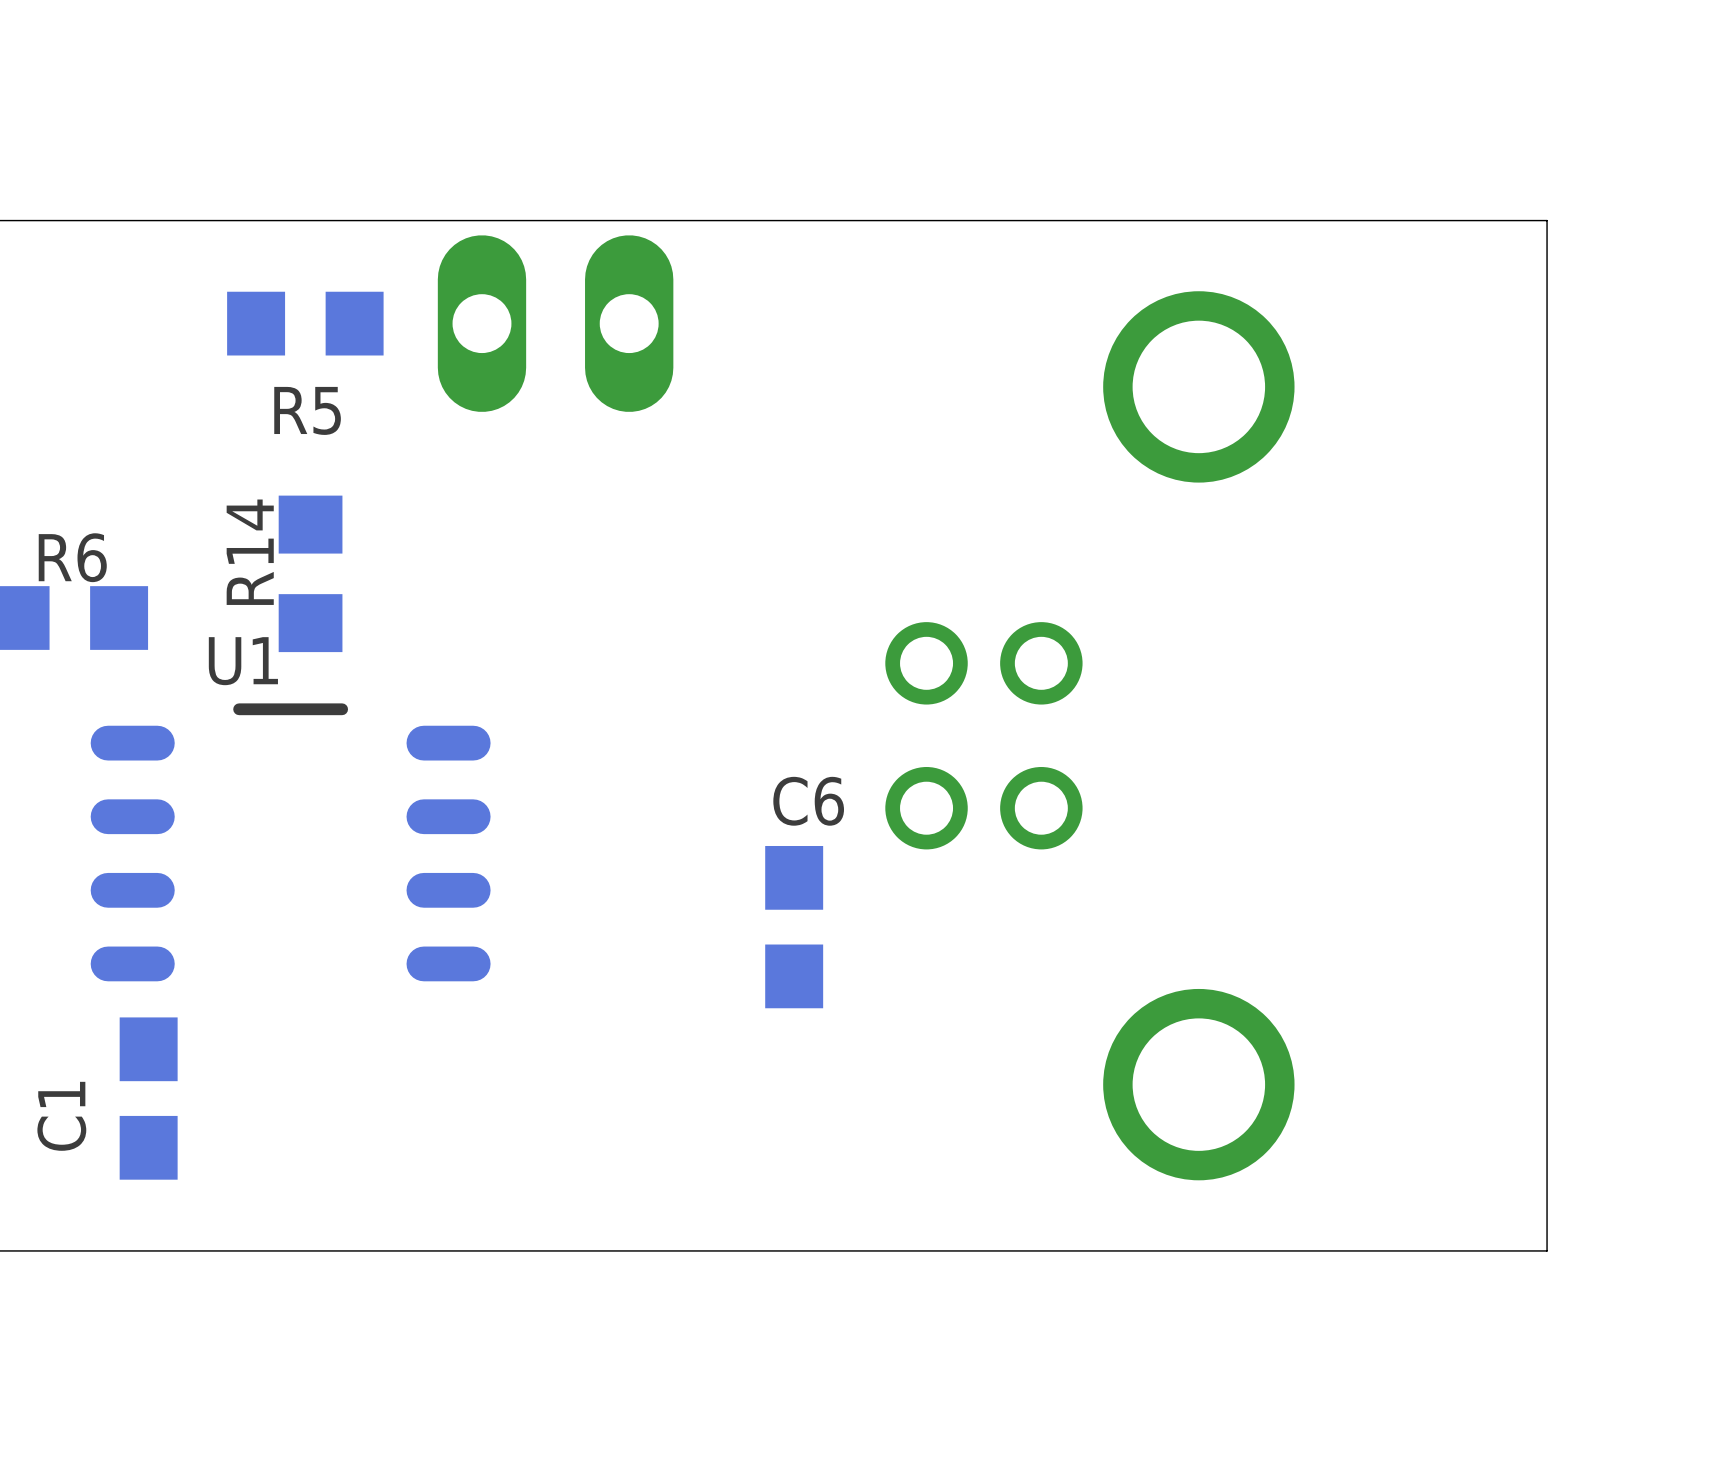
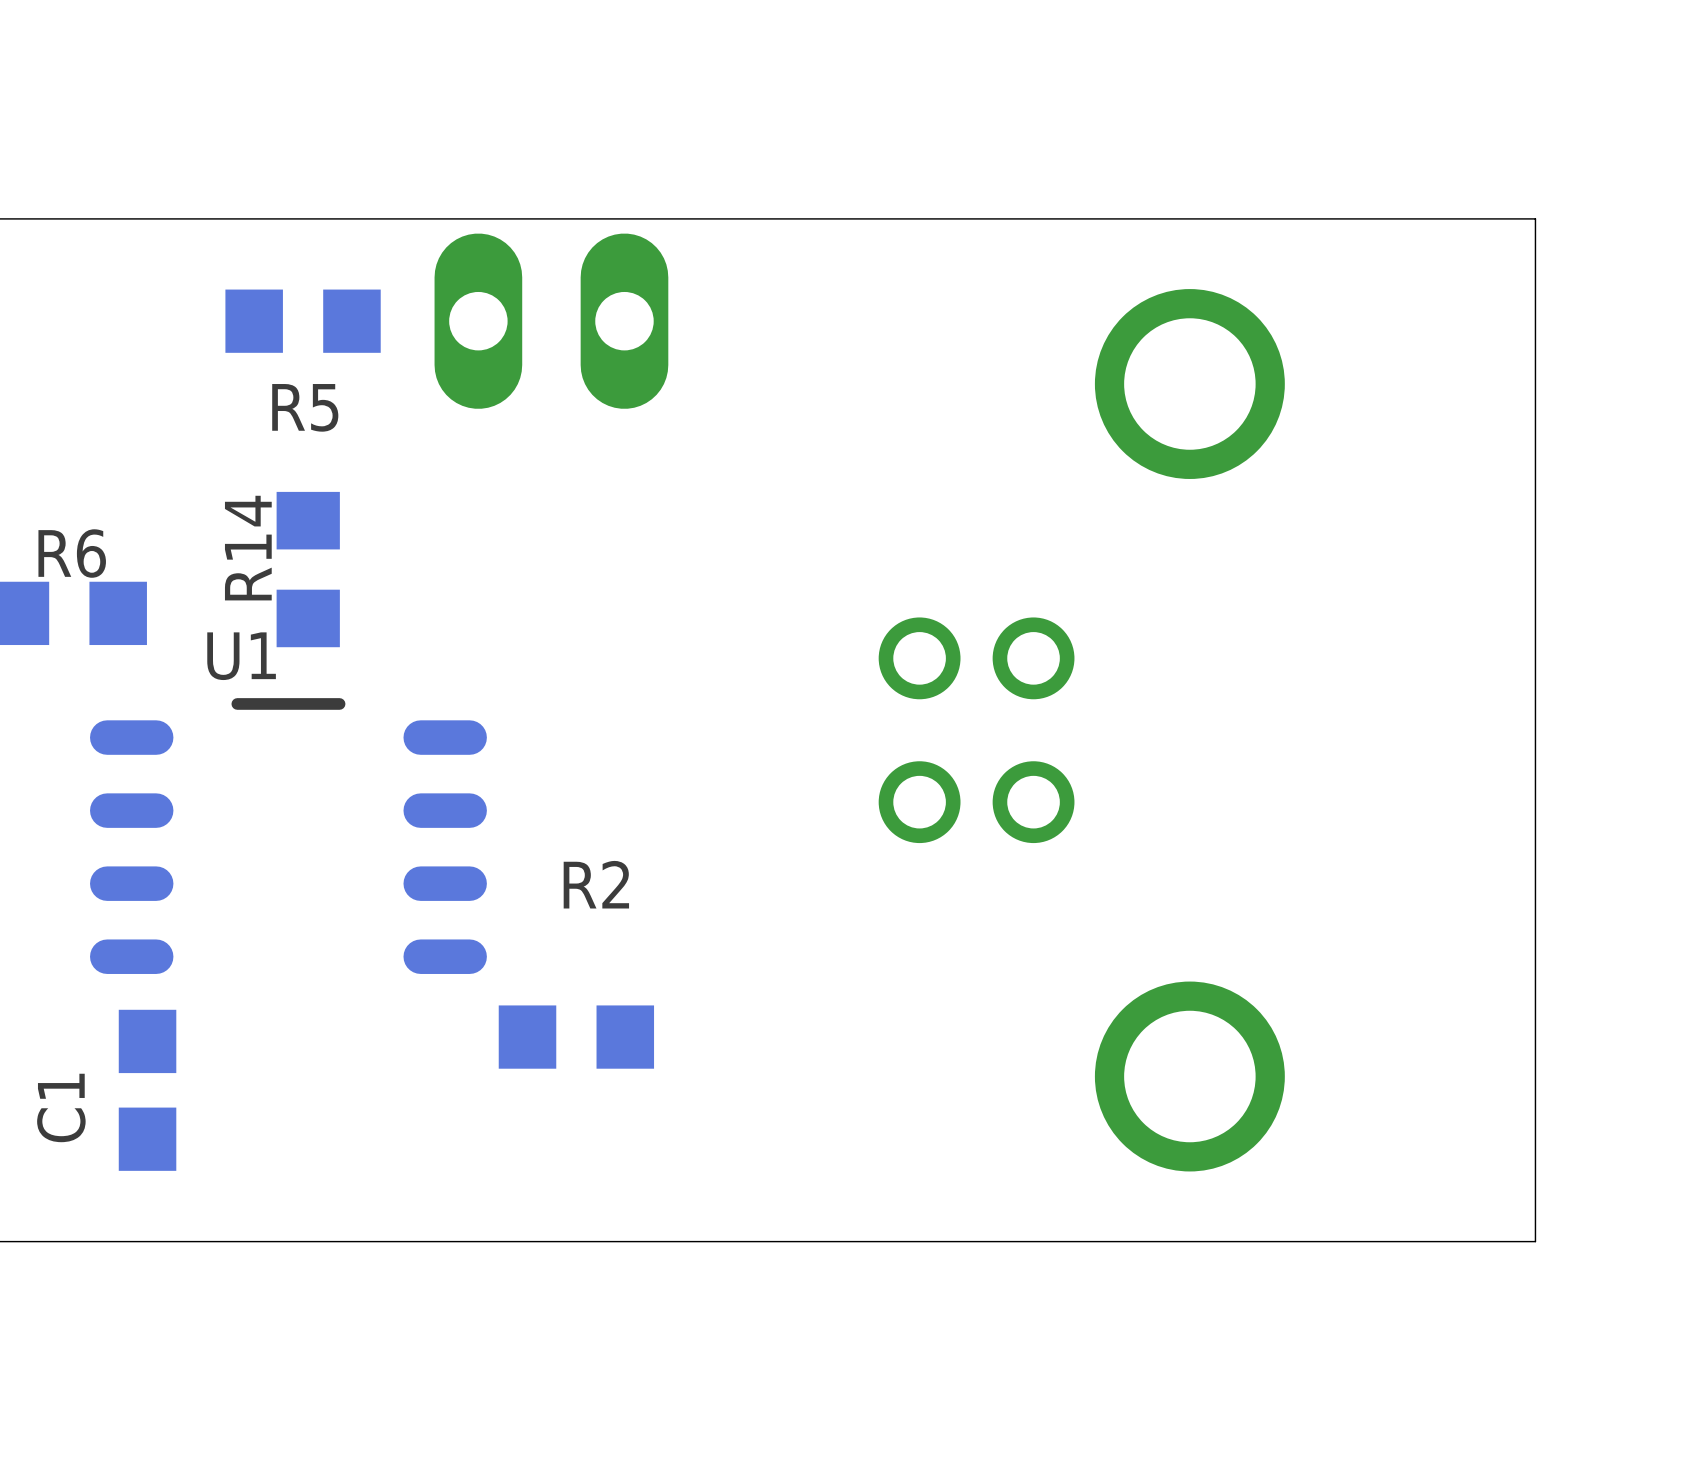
C6: (794, 927) -> none
R2: none -> (576, 1037)

